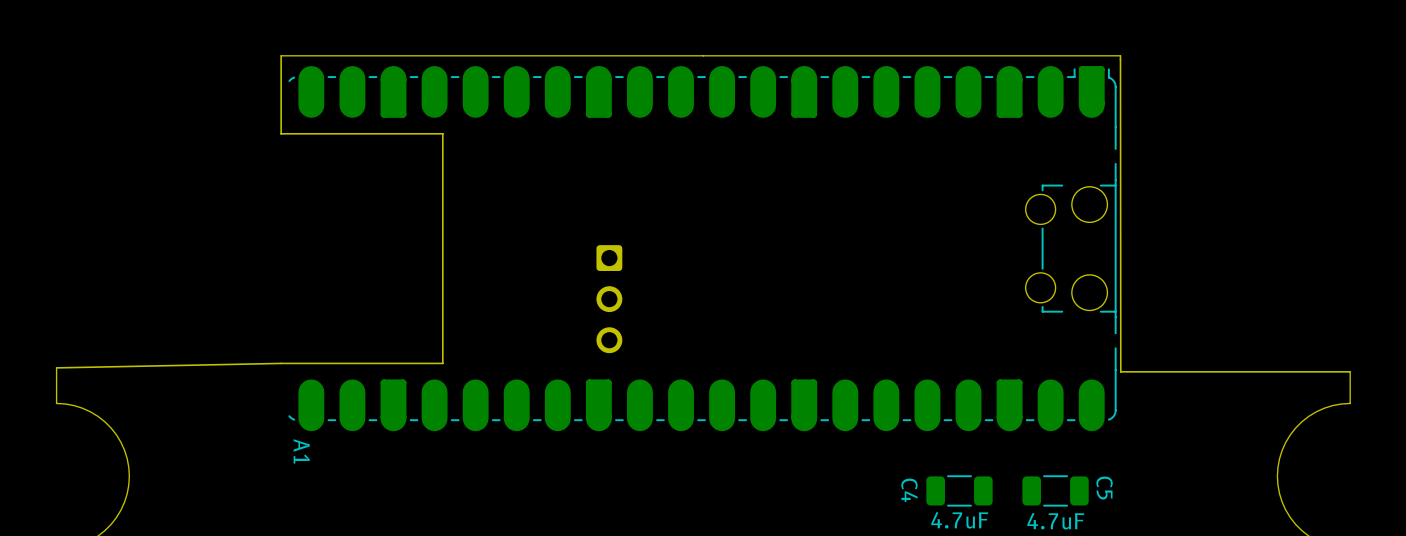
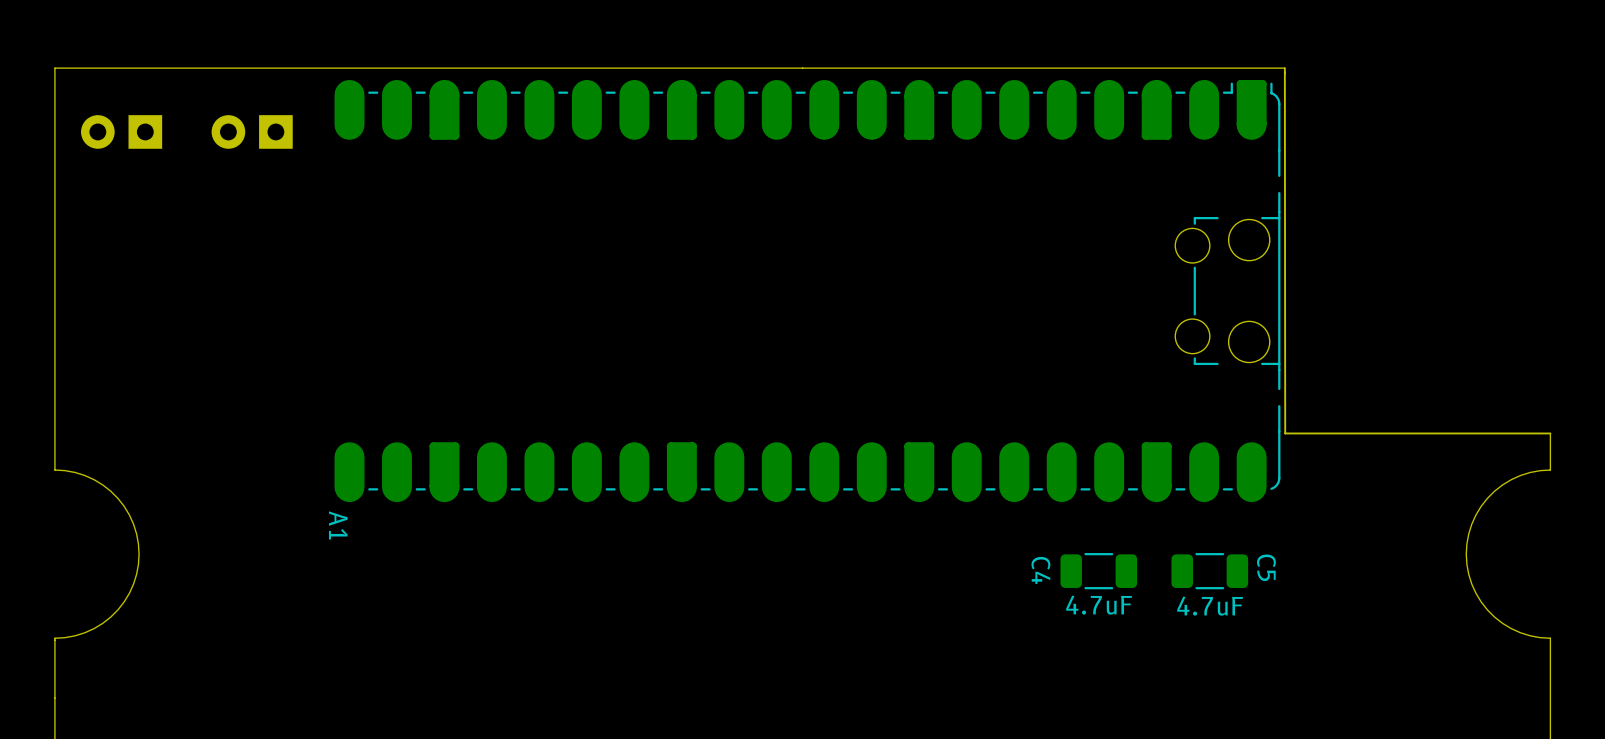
board edge: (281, 55) (281, 133) (442, 133) (442, 363) (281, 363) (56, 367) -> (314, 68) (54, 68) (54, 428)
A1 footprint: [288, 66, 1117, 432] -> [334, 79, 1281, 503]
part: none -> (121, 131)
part: none -> (252, 131)

